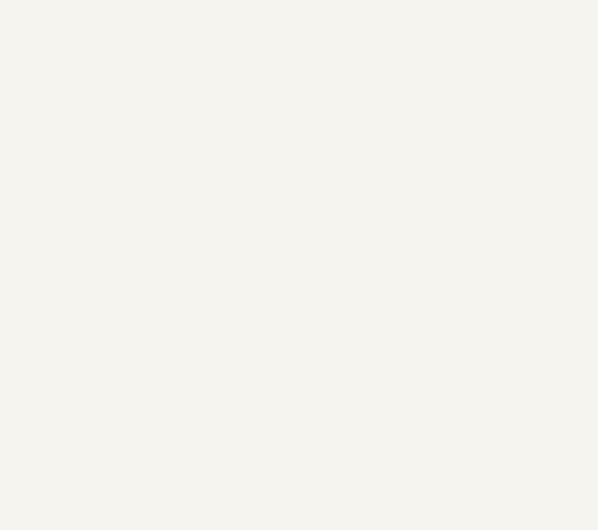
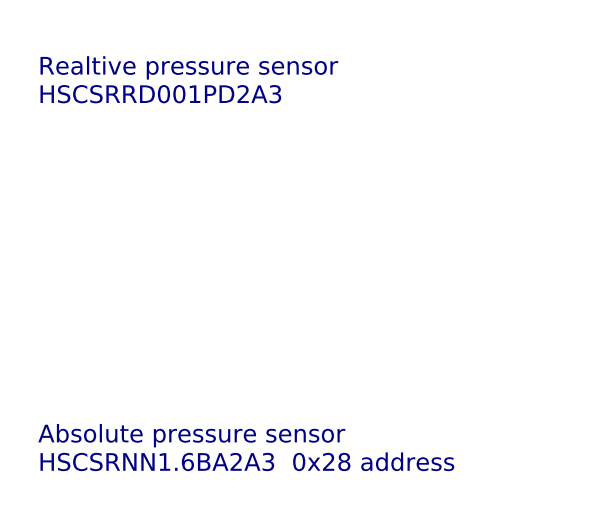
text: none -> Realtive pressure sensor (189, 67)
text: none -> HSCSRRD001PD2A3 (160, 94)
text: none -> Absolute pressure sensor (191, 435)
text: none -> HSCSRNN1.6BA2A3 0x28 address (247, 461)

